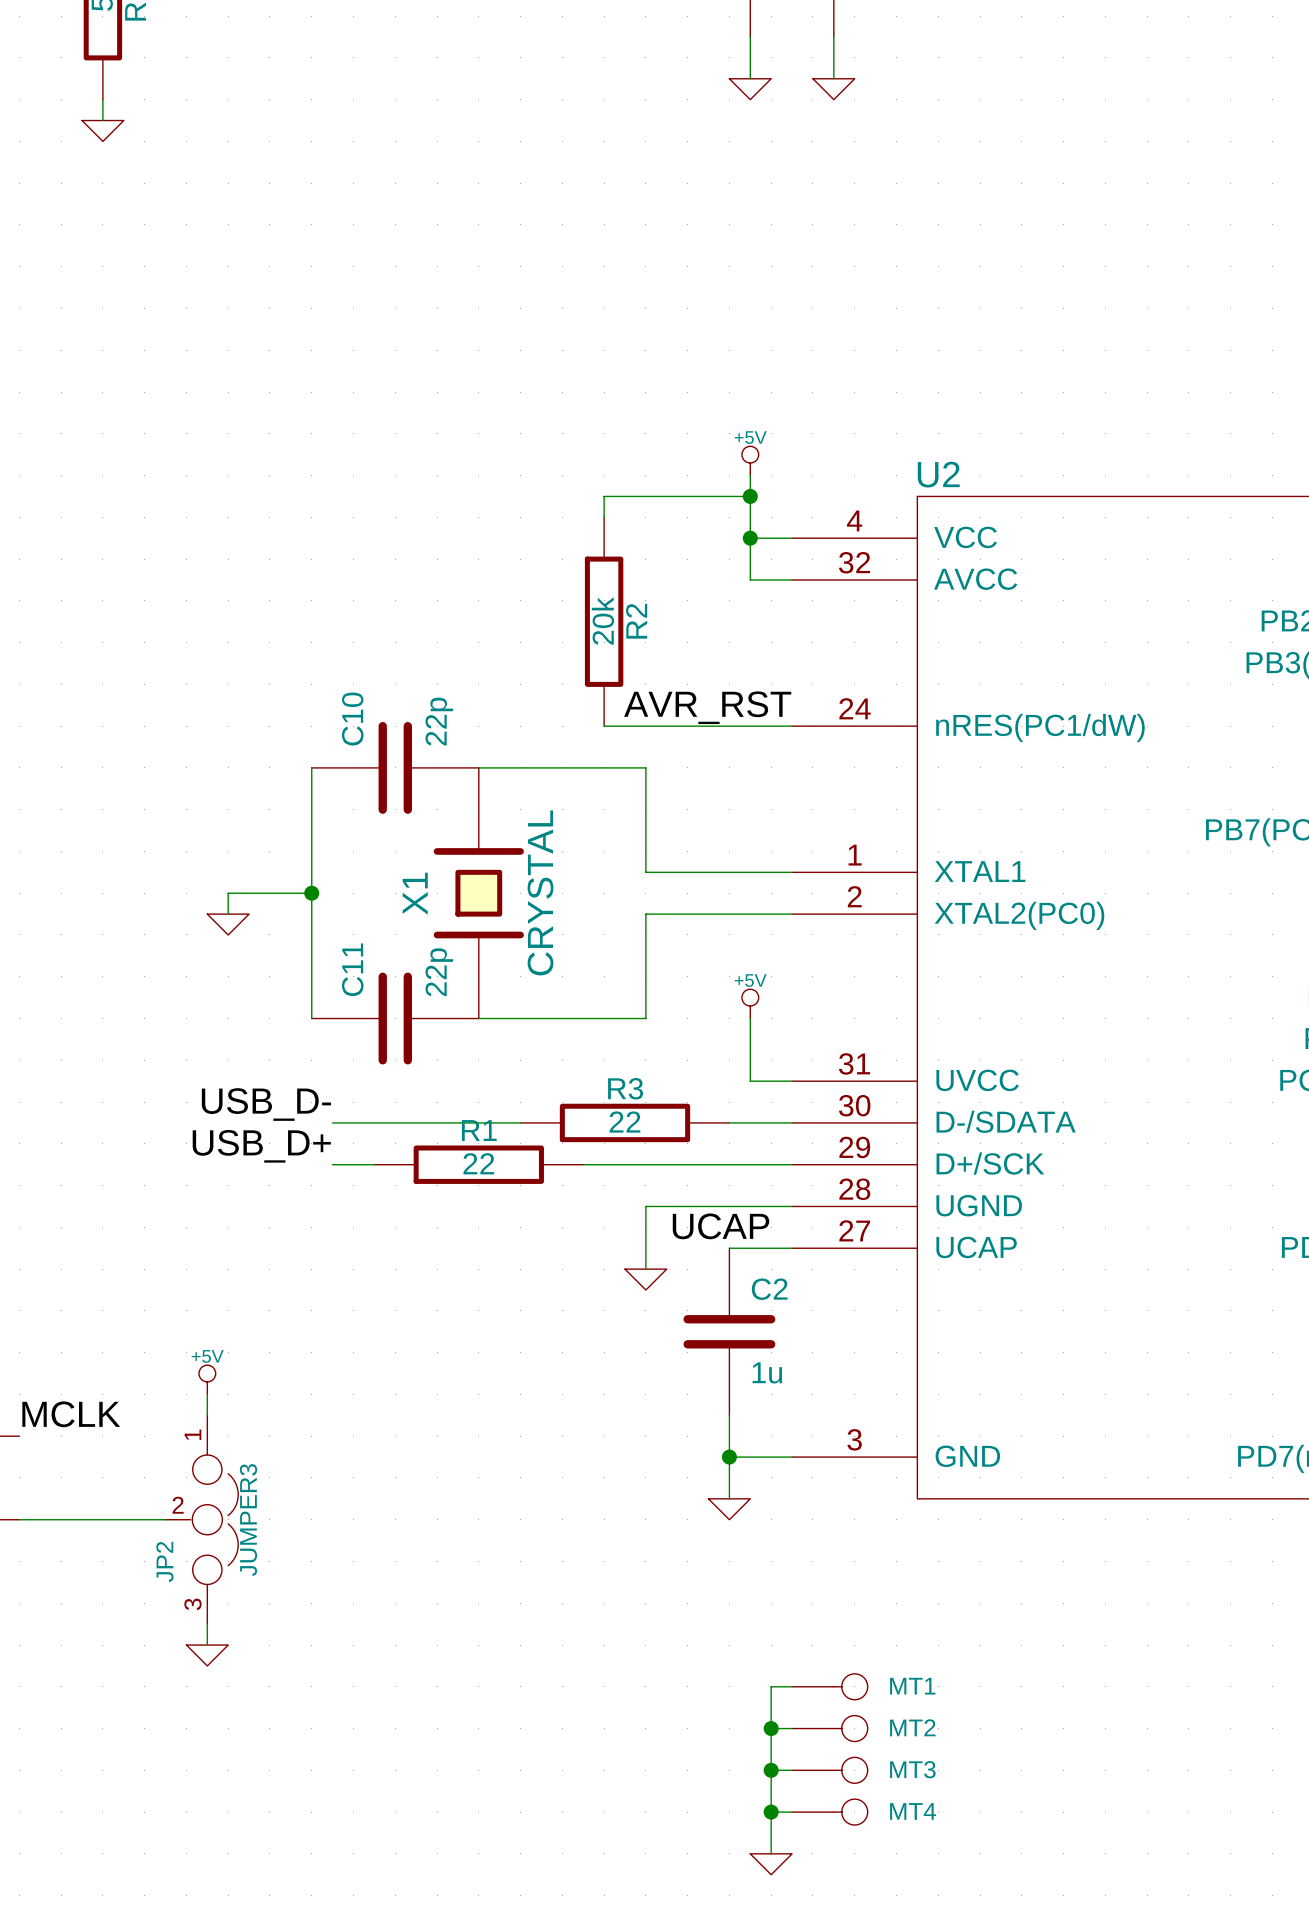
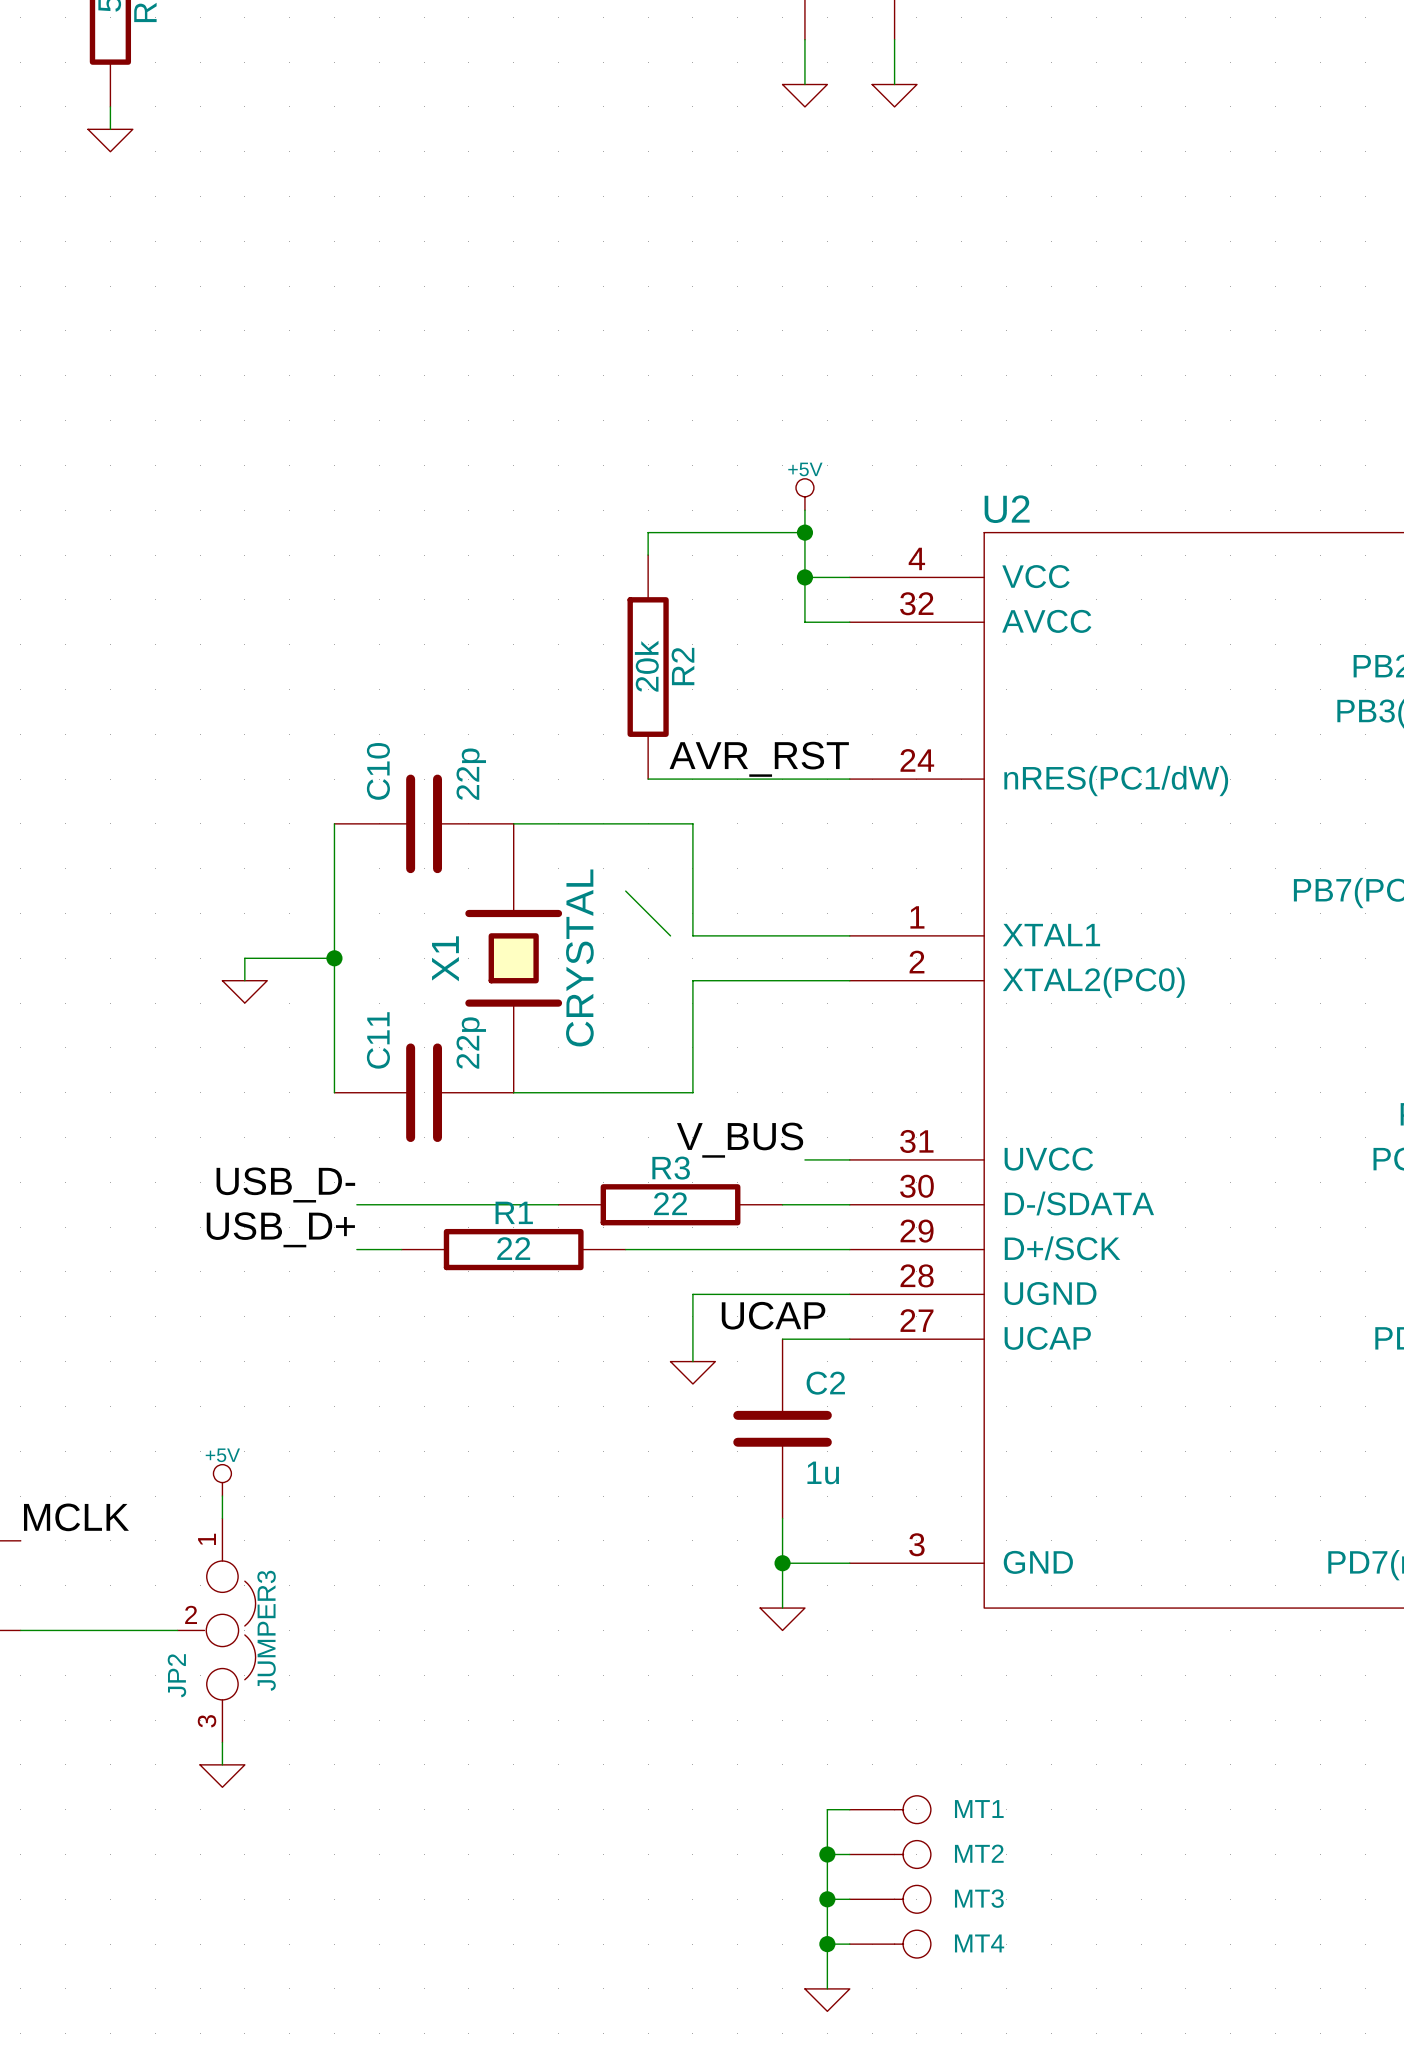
wire: none -> (625, 891) (670, 935)
power symbol: +5V (750, 1003) -> none
wire: (750, 1018) (750, 1081) -> none
label: none -> V_BUS (740, 1140)

